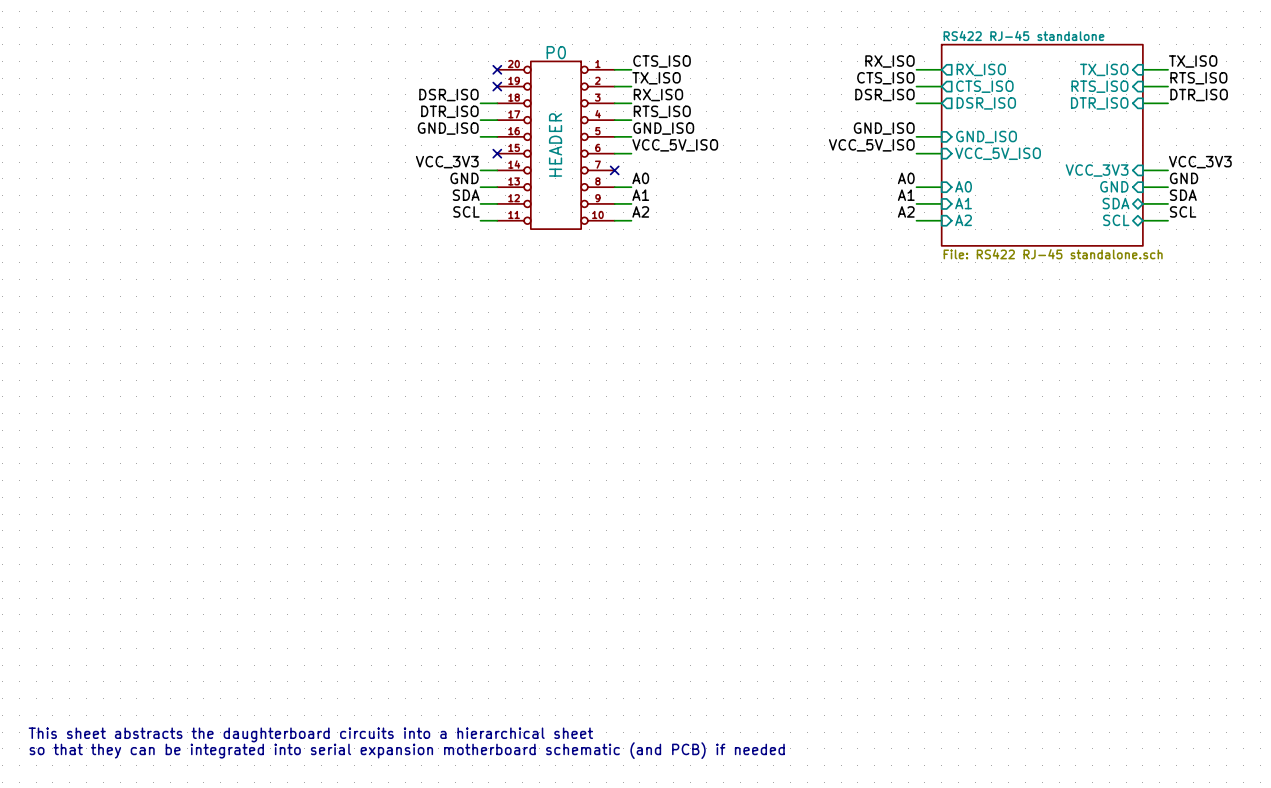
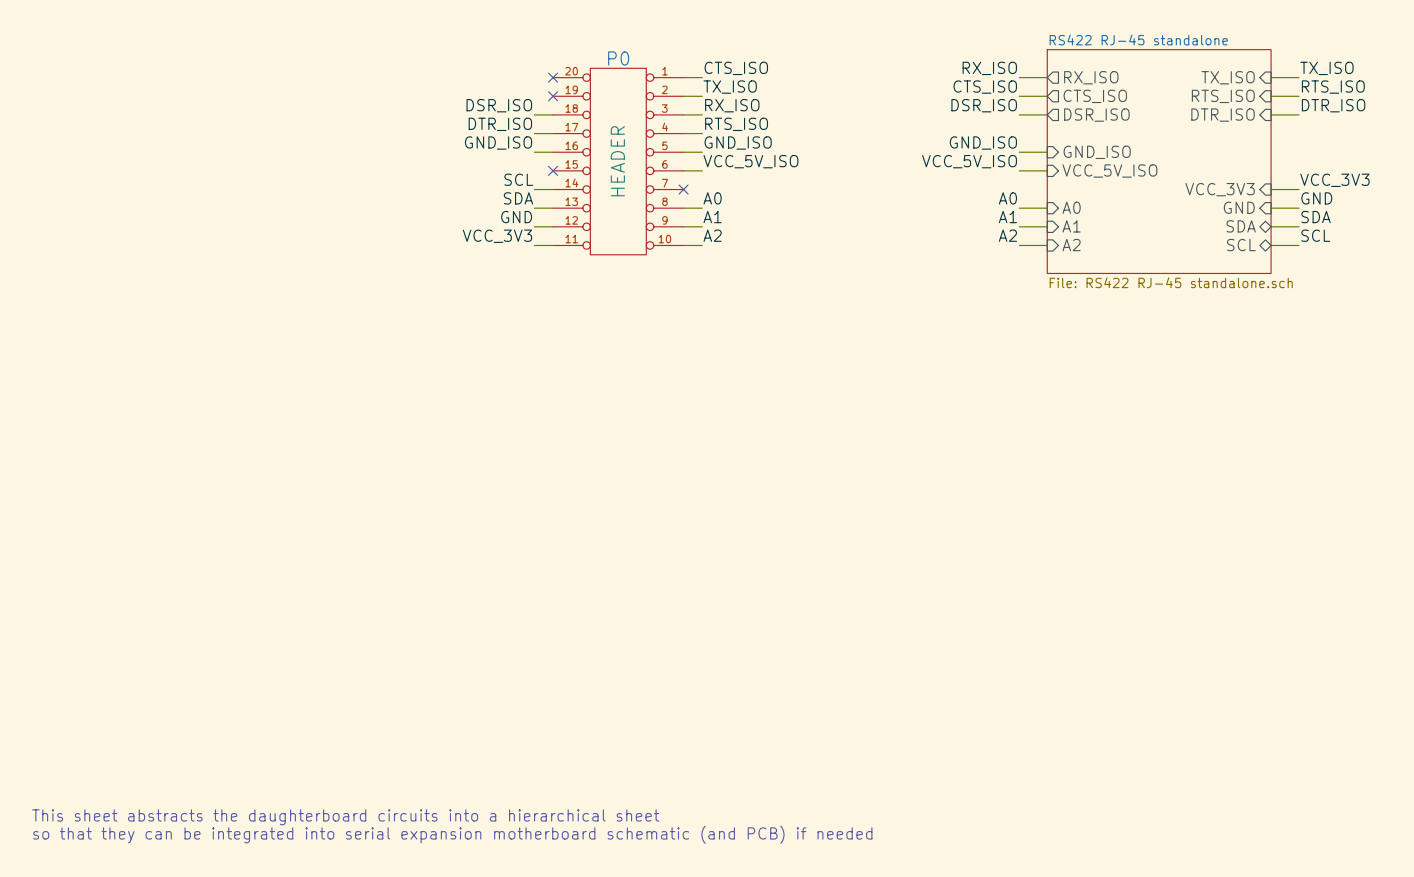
label: VCC_3V3 (447, 162) -> SCL (518, 179)
label: GND (464, 178) -> SDA (518, 198)
label: SDA (466, 195) -> GND (516, 217)
label: SCL (466, 211) -> VCC_3V3 (497, 236)

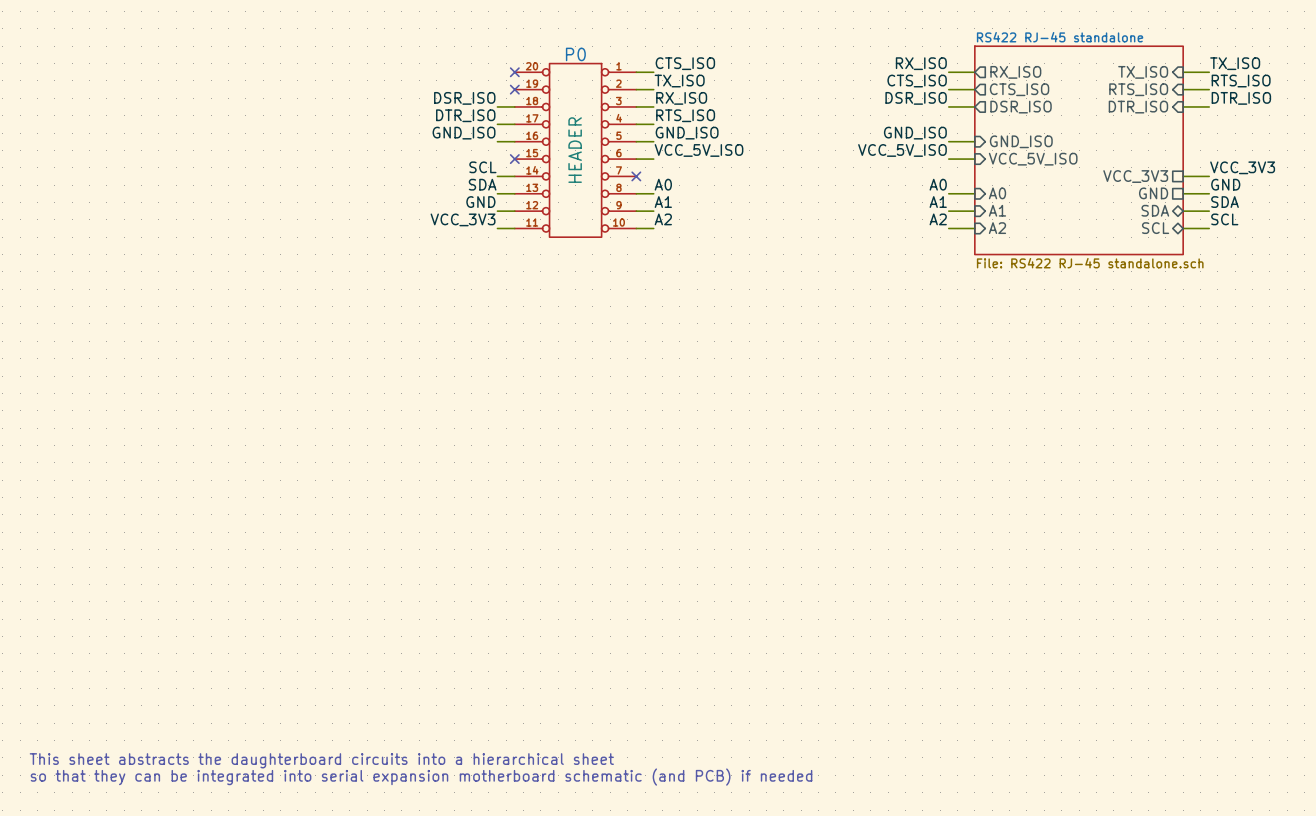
sheet pin shape: input (1220, 189) -> passive (1135, 176)
sheet pin shape: input (1239, 207) -> passive (1153, 193)

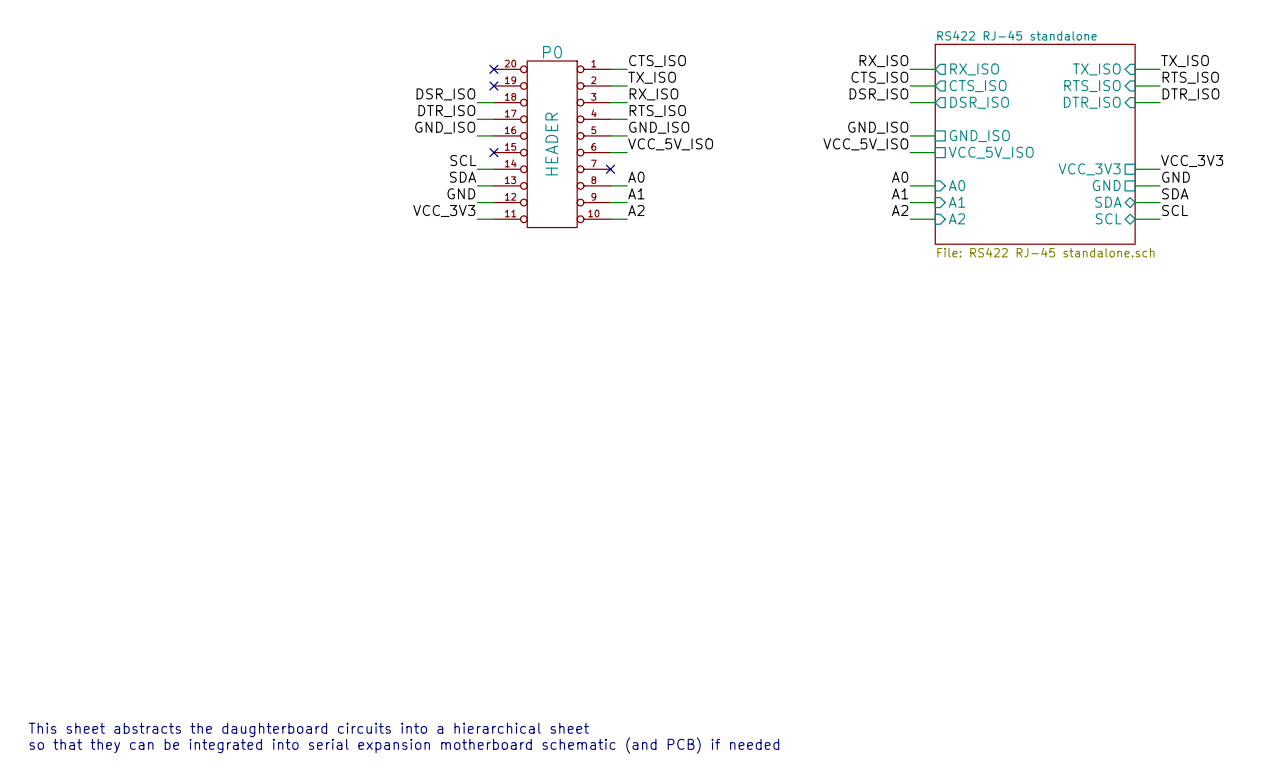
sheet pin shape: input (1021, 141) -> passive (979, 136)
sheet pin shape: input (1033, 159) -> passive (991, 152)

